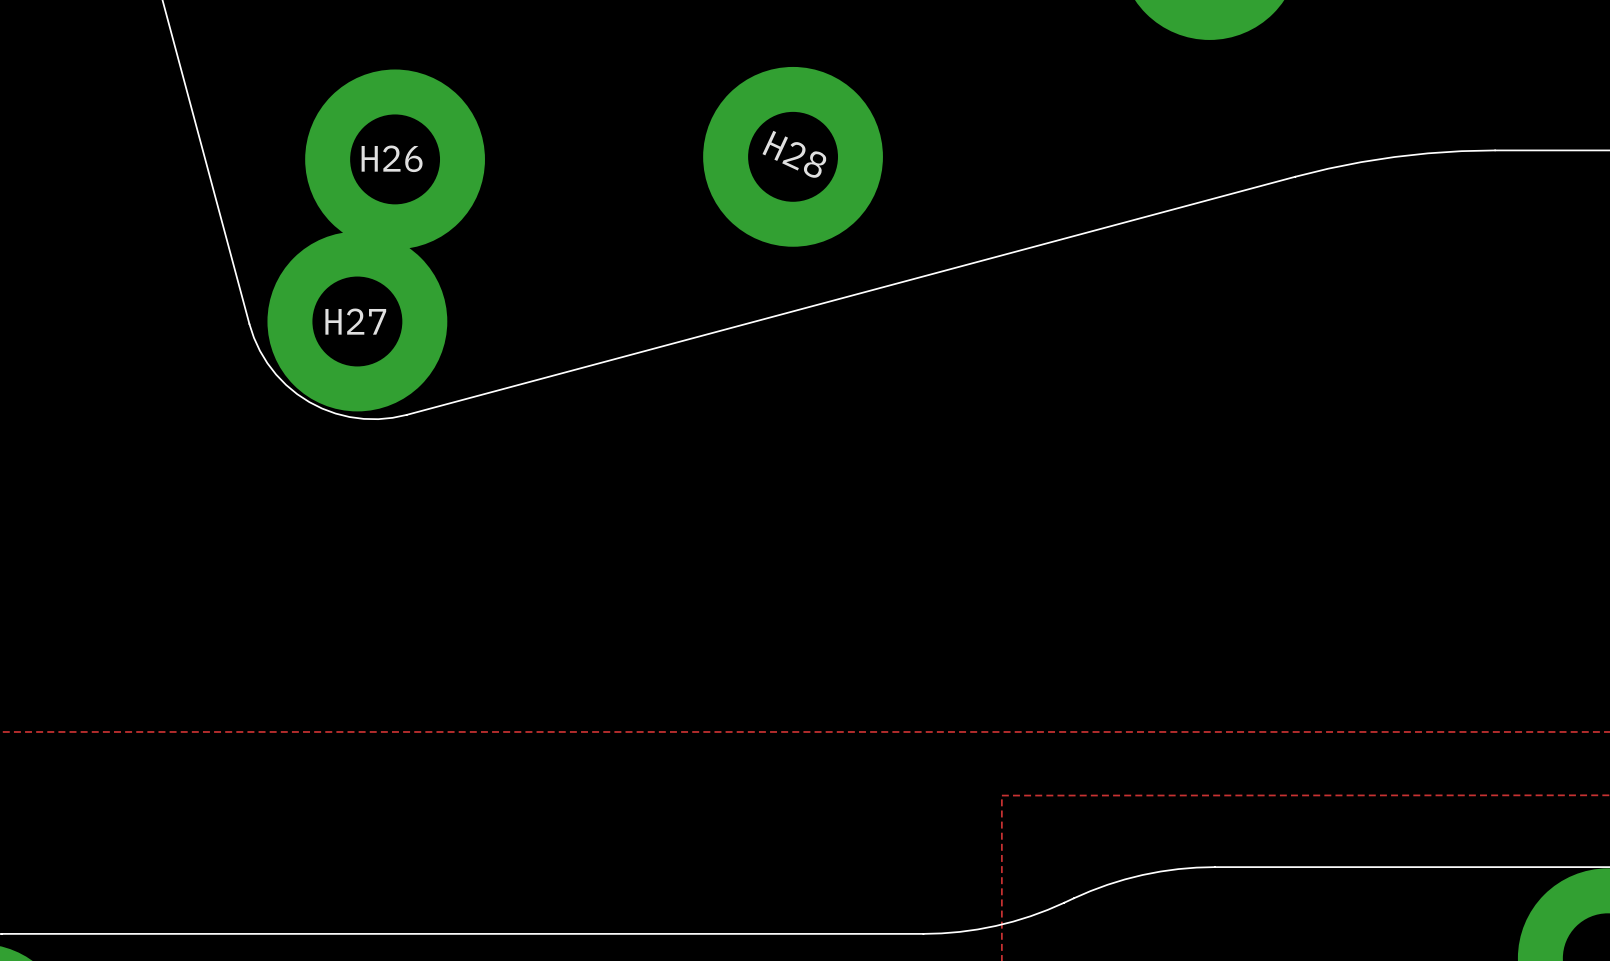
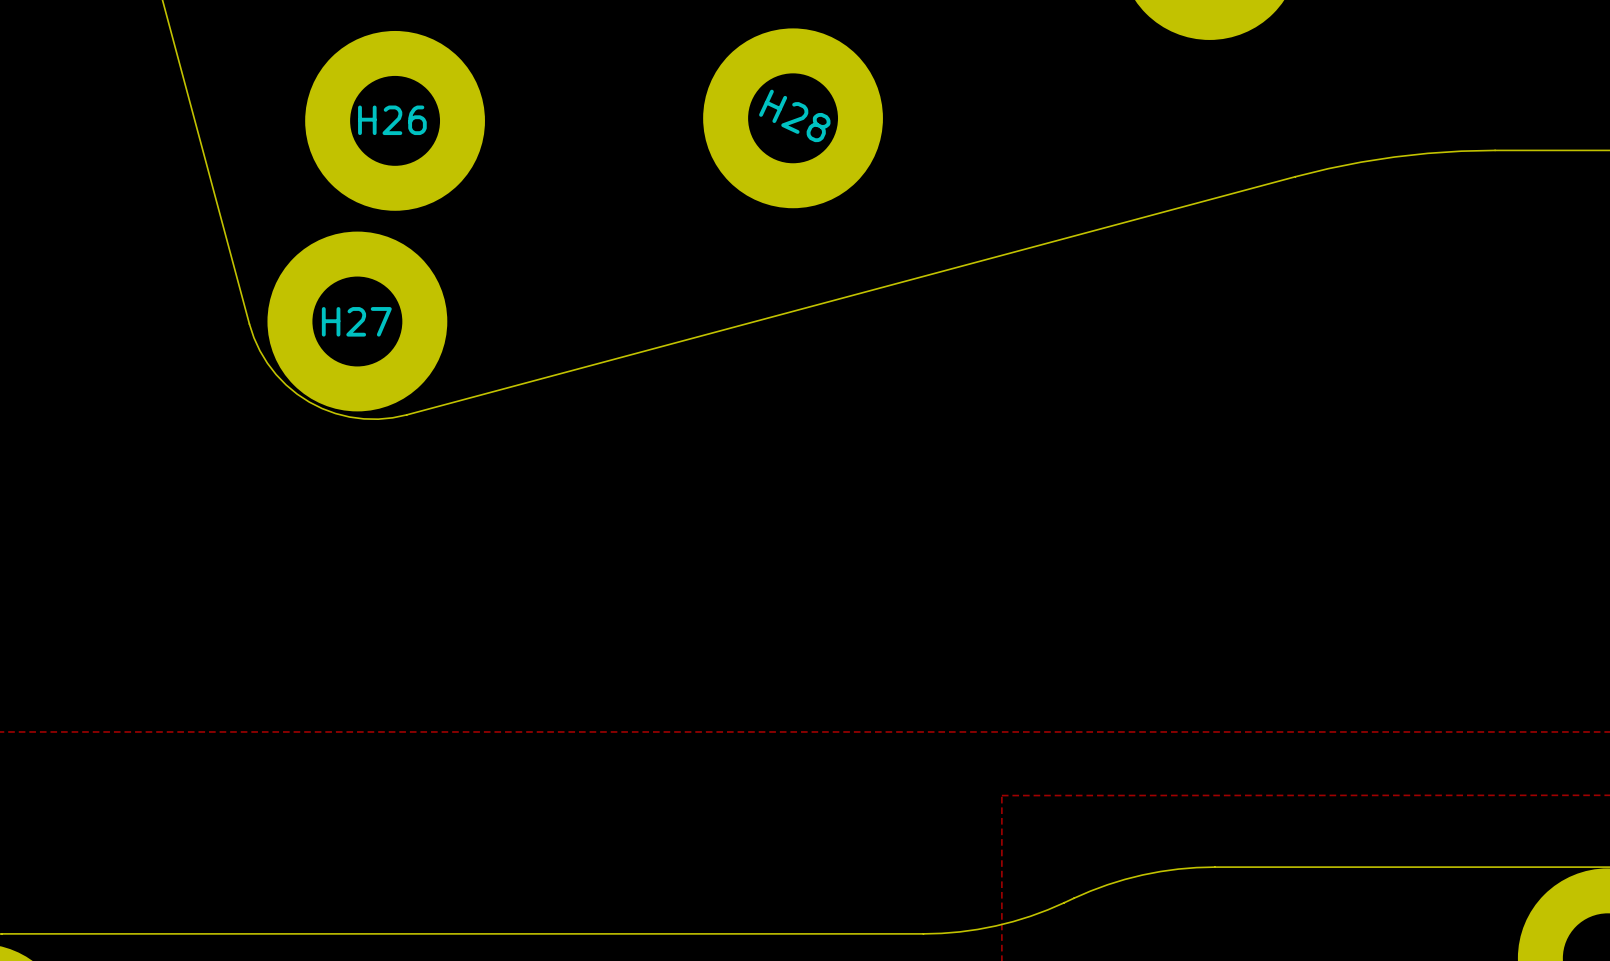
H28 position: (793, 156) -> (793, 118)
H26 position: (395, 159) -> (395, 120)

